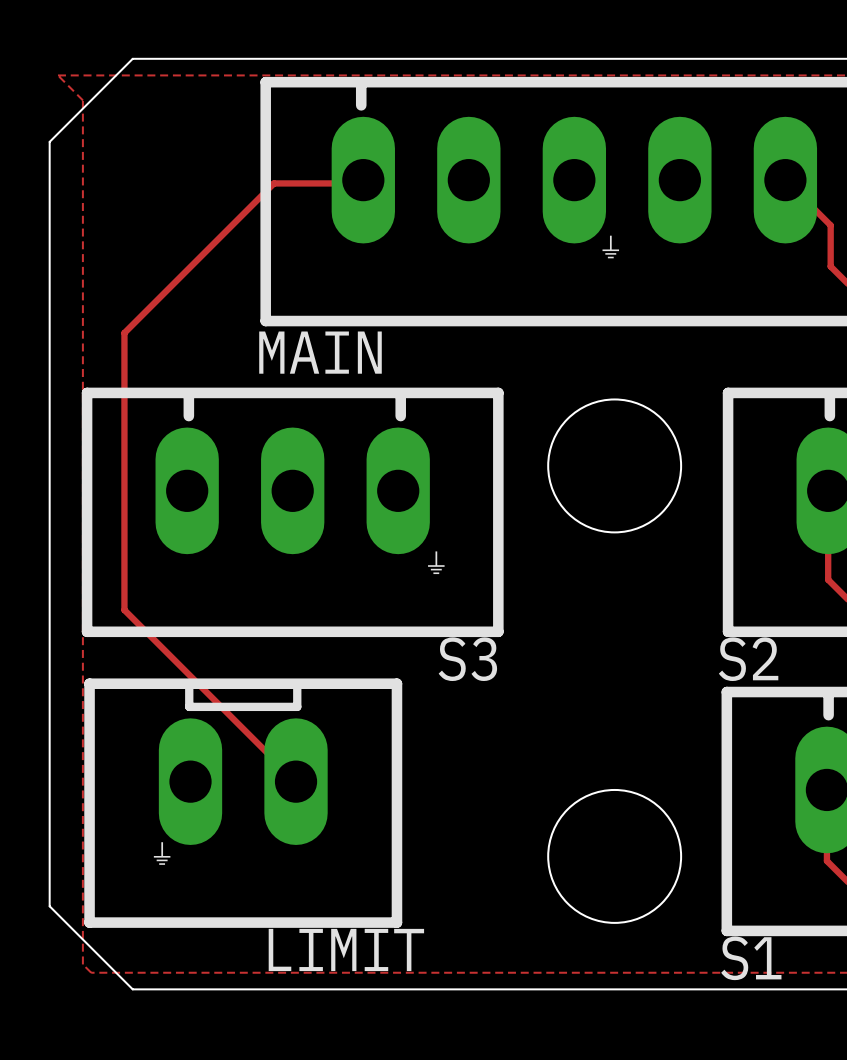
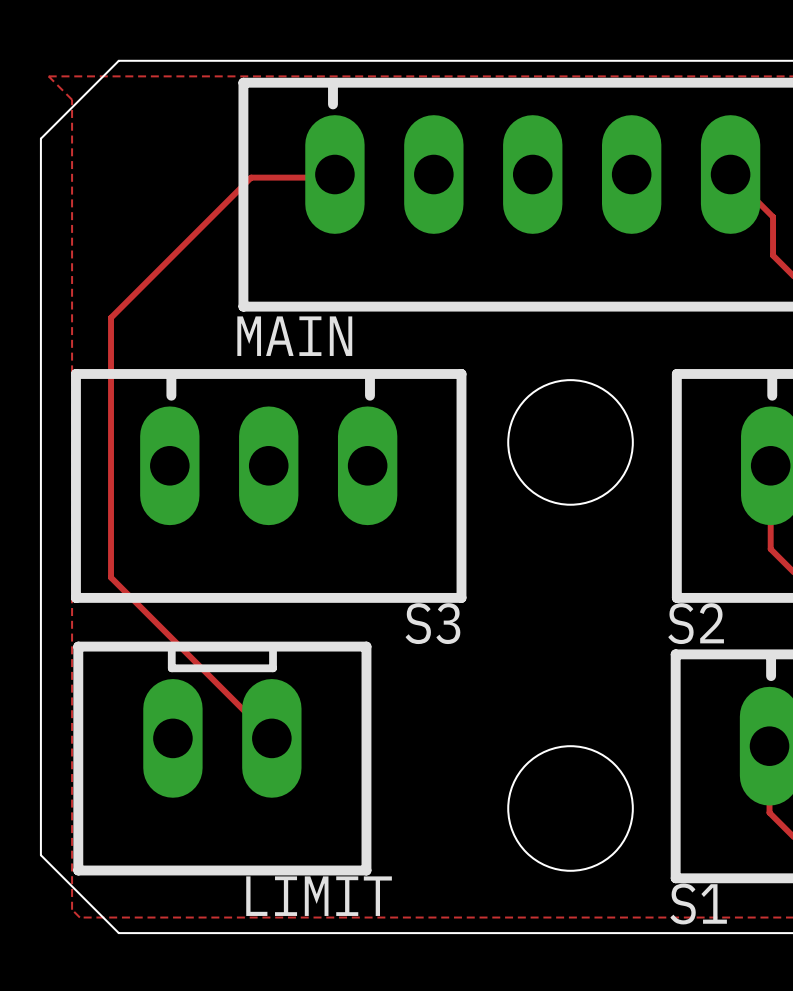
text: ⏚ (610, 247) -> none
text: ⏚ (436, 562) -> none
text: ⏚ (162, 853) -> none

